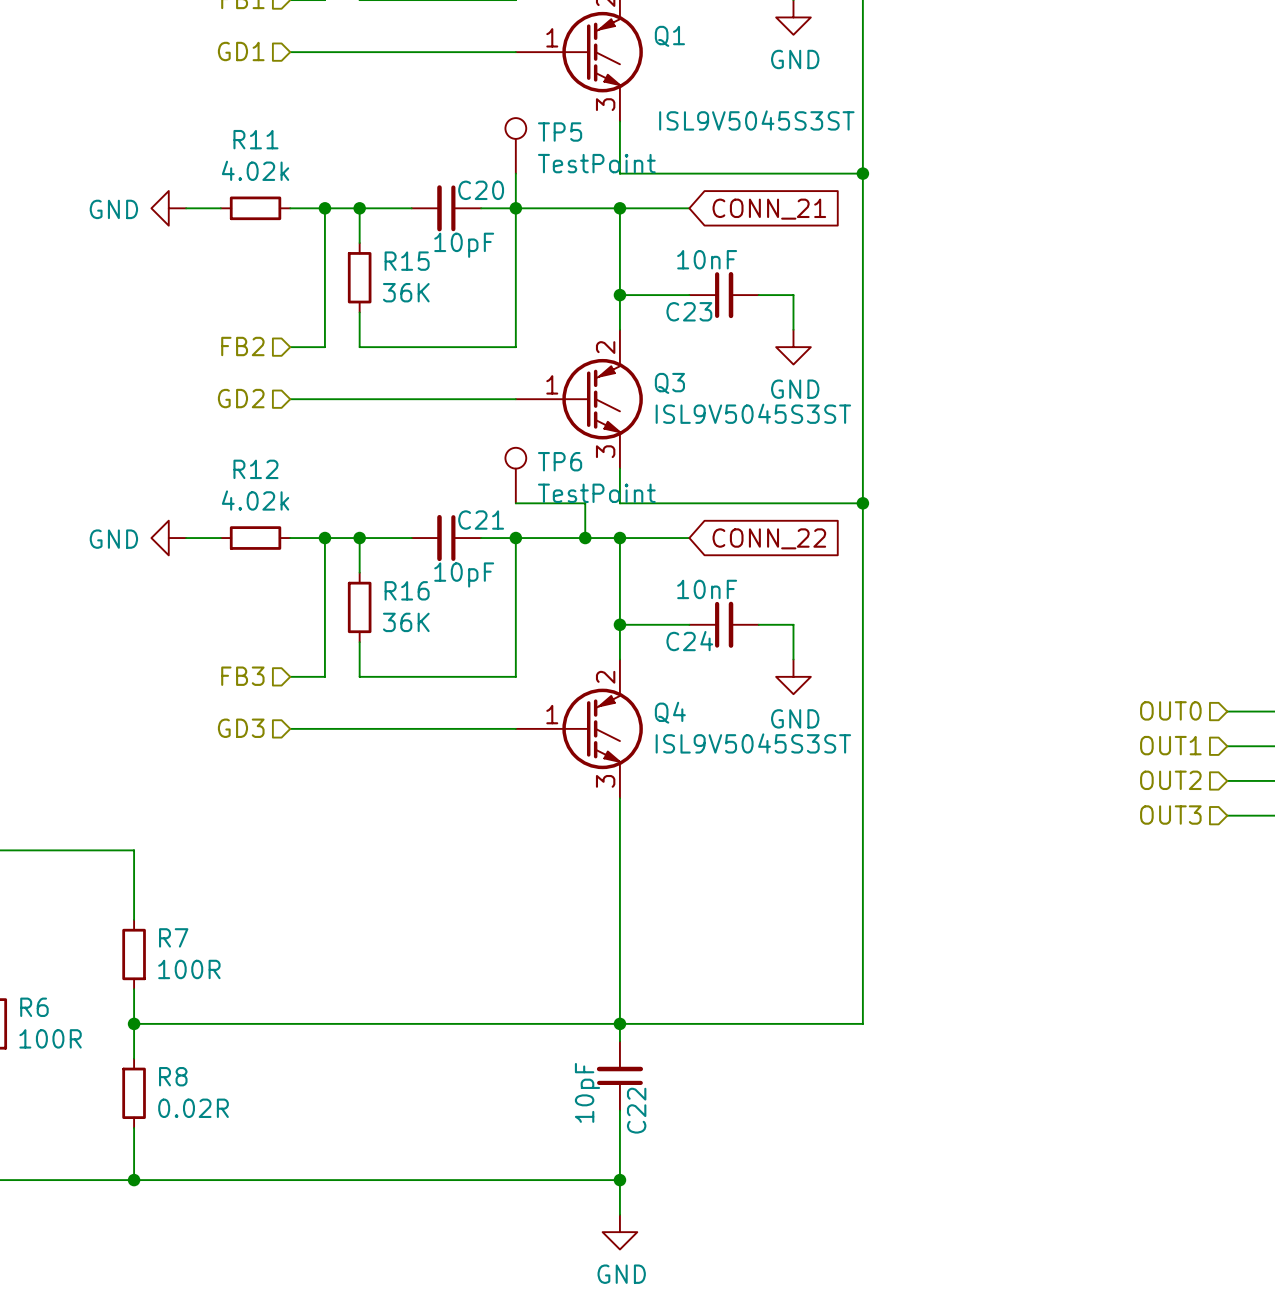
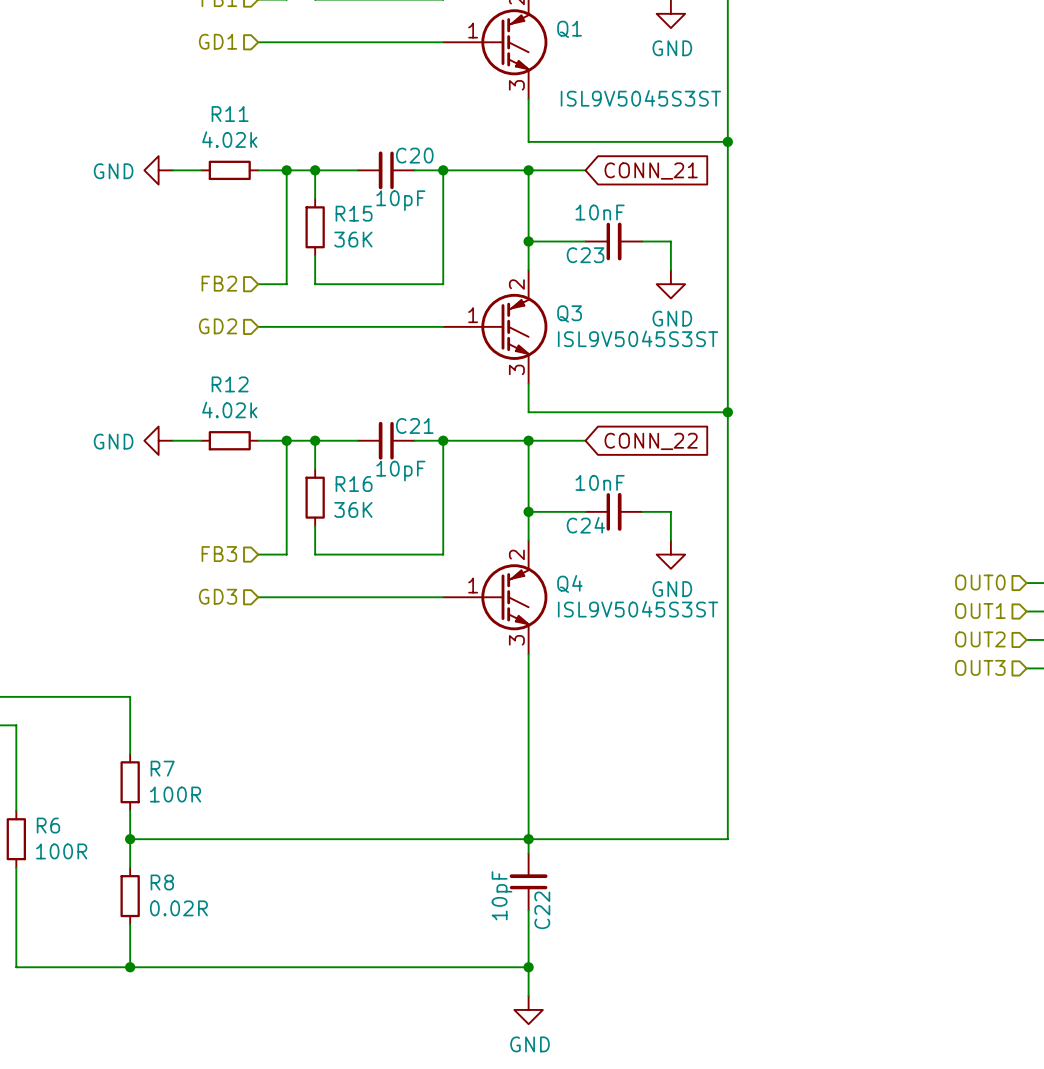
TP5: TestPoint (515, 145) -> none
wire: (515, 173) (515, 208) -> none
TP6: TestPoint (515, 475) -> none
wire: (515, 503) (585, 503) (585, 538) -> none
junction: (585, 538) -> none

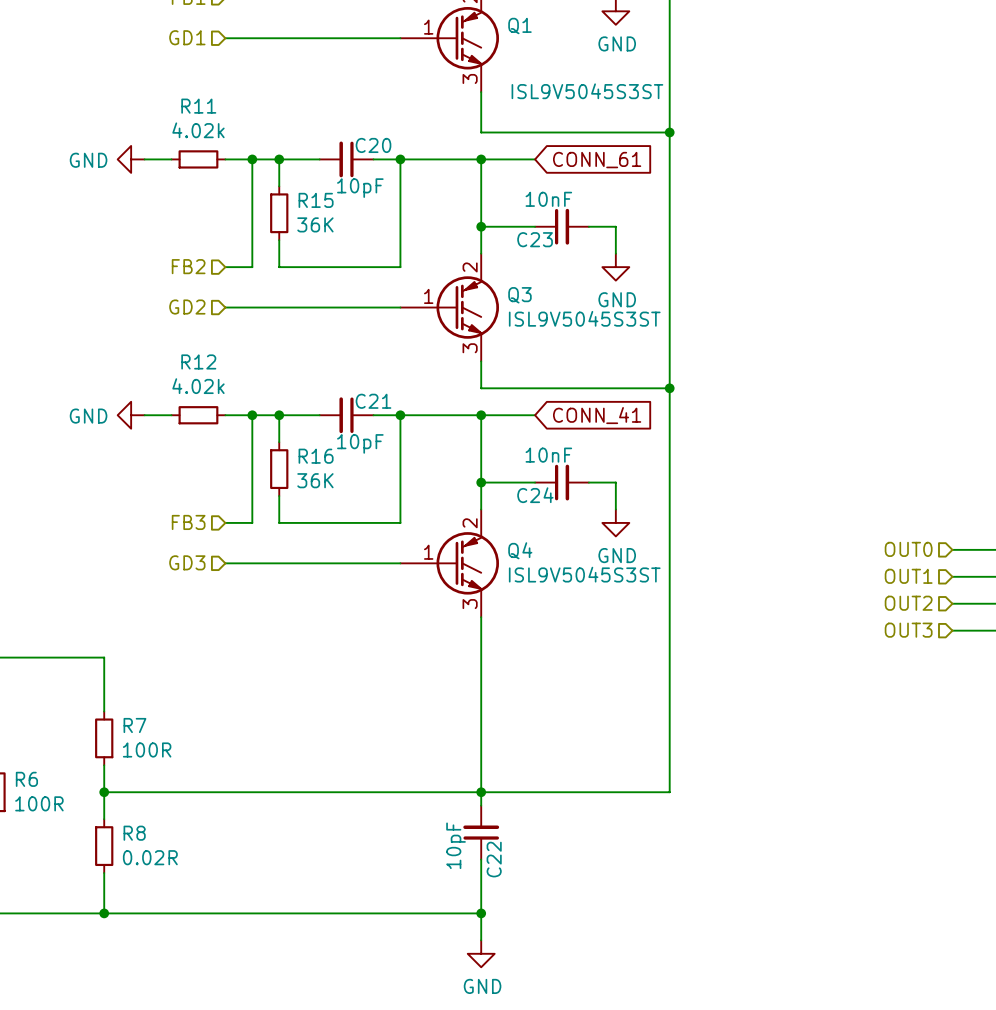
global label: CONN_21 (651, 171) -> CONN_61 (597, 160)
global label: CONN_22 (651, 441) -> CONN_41 (597, 415)

